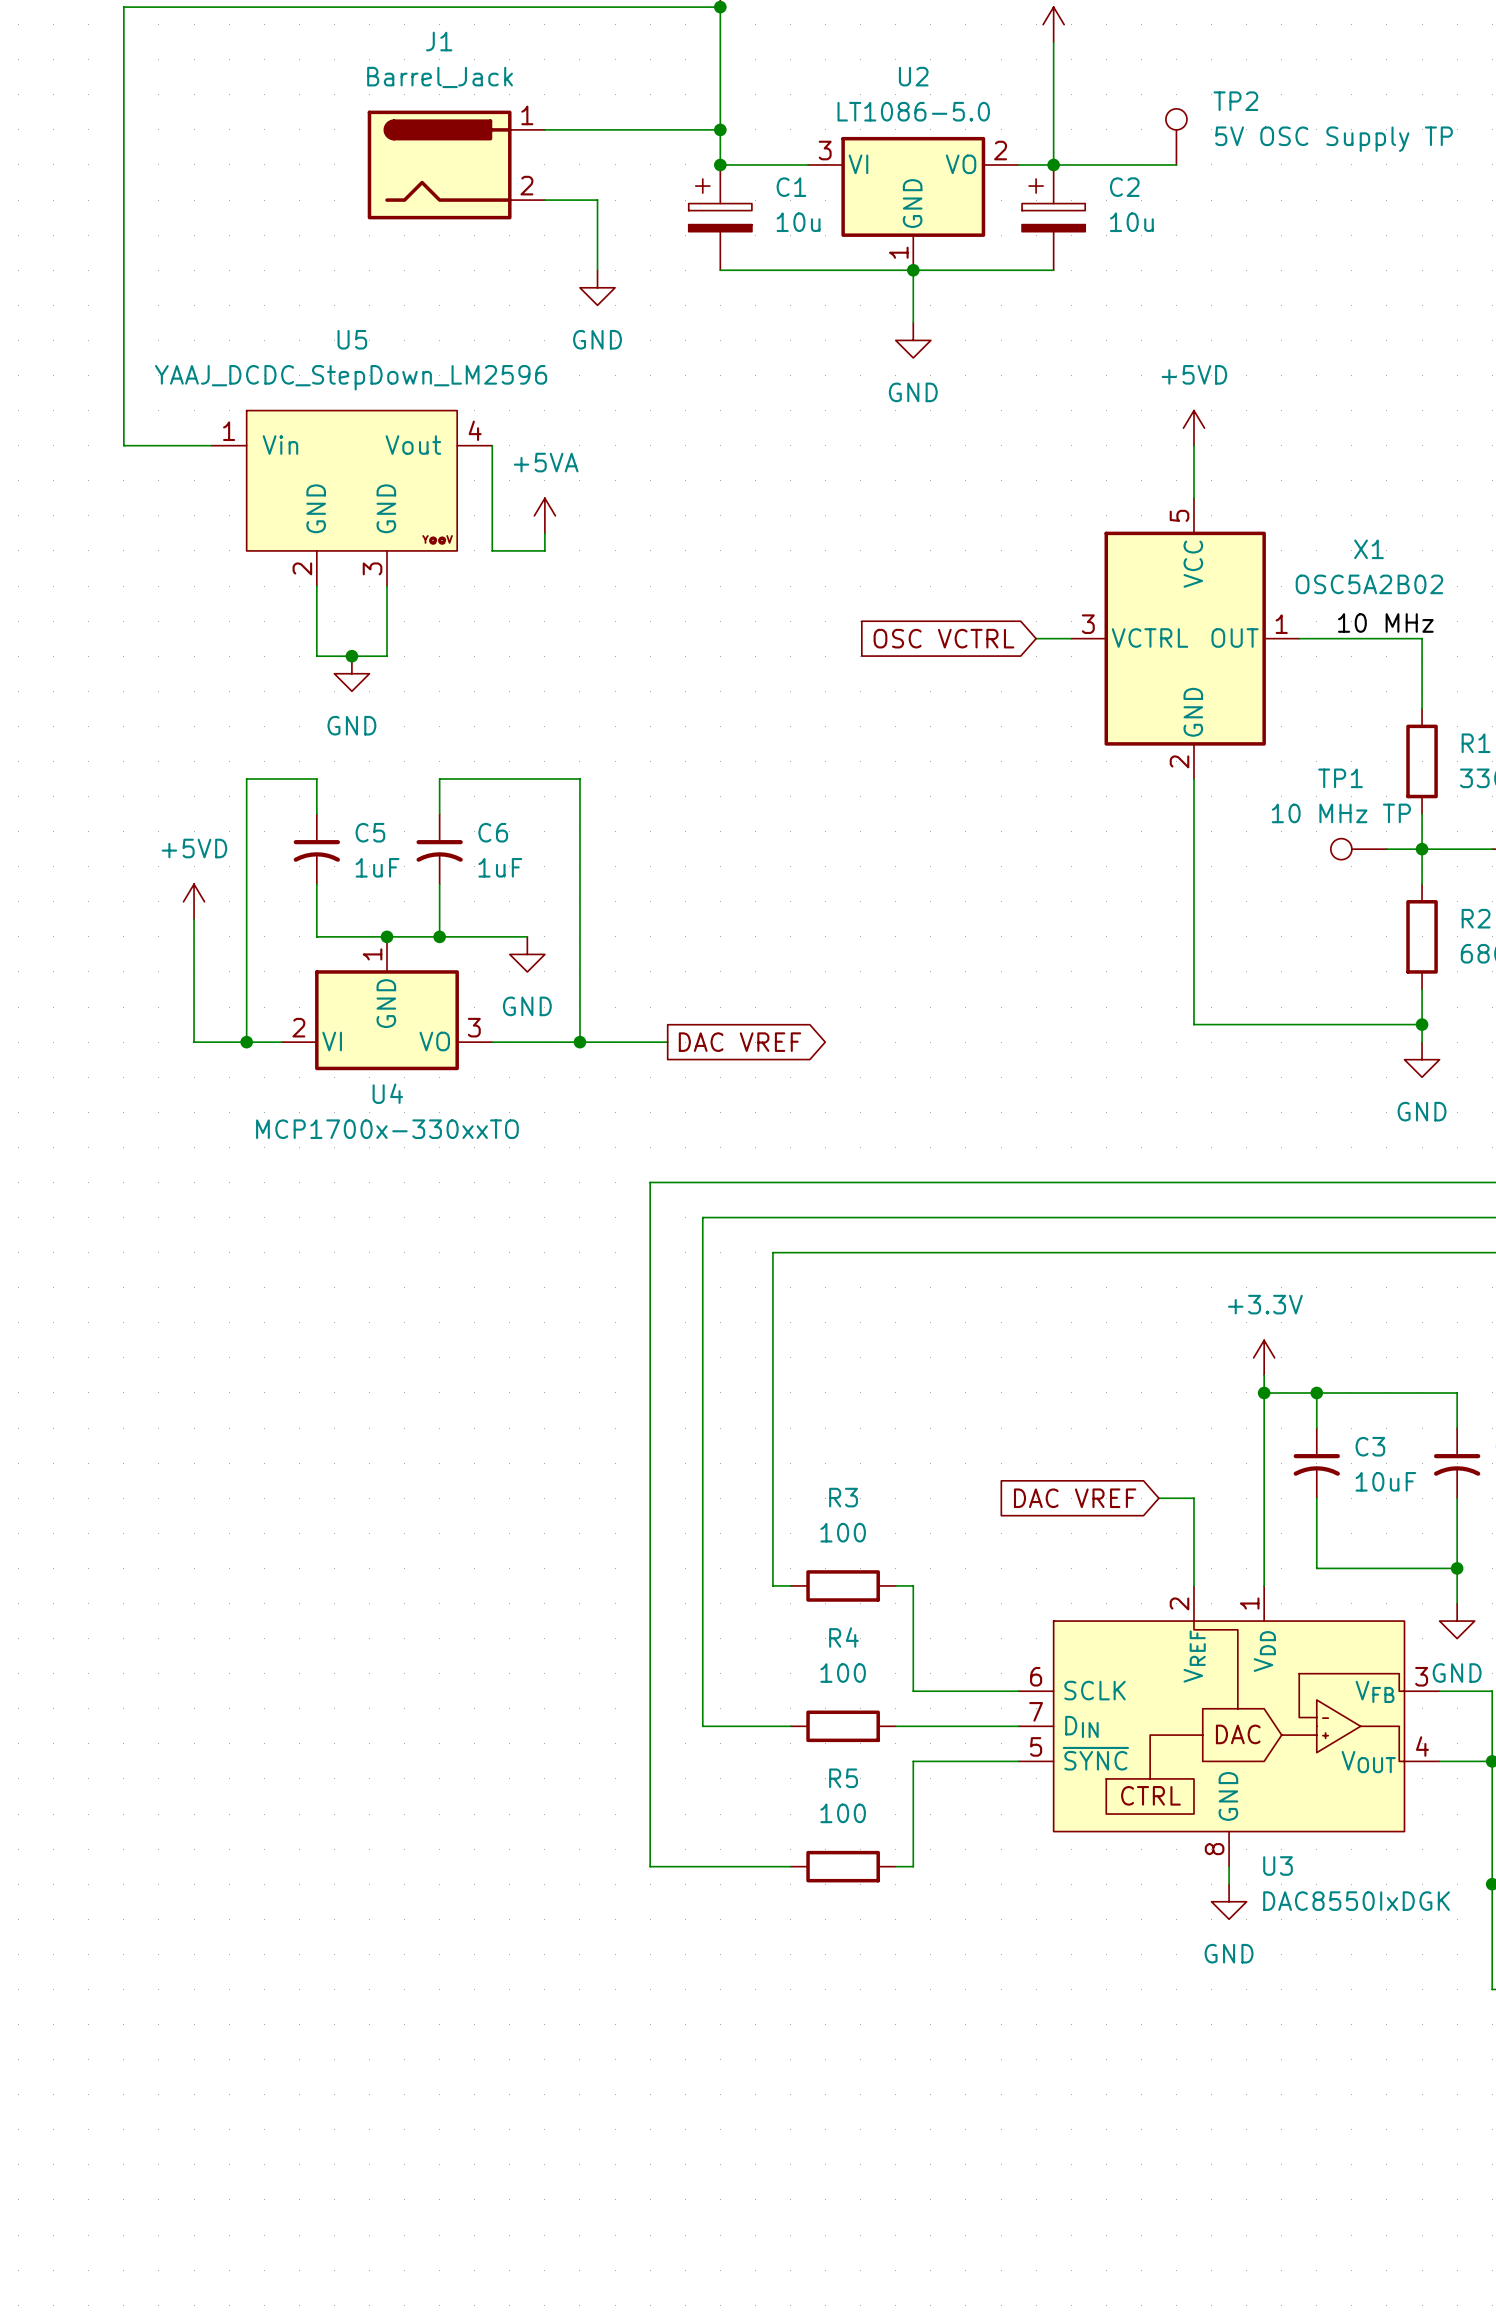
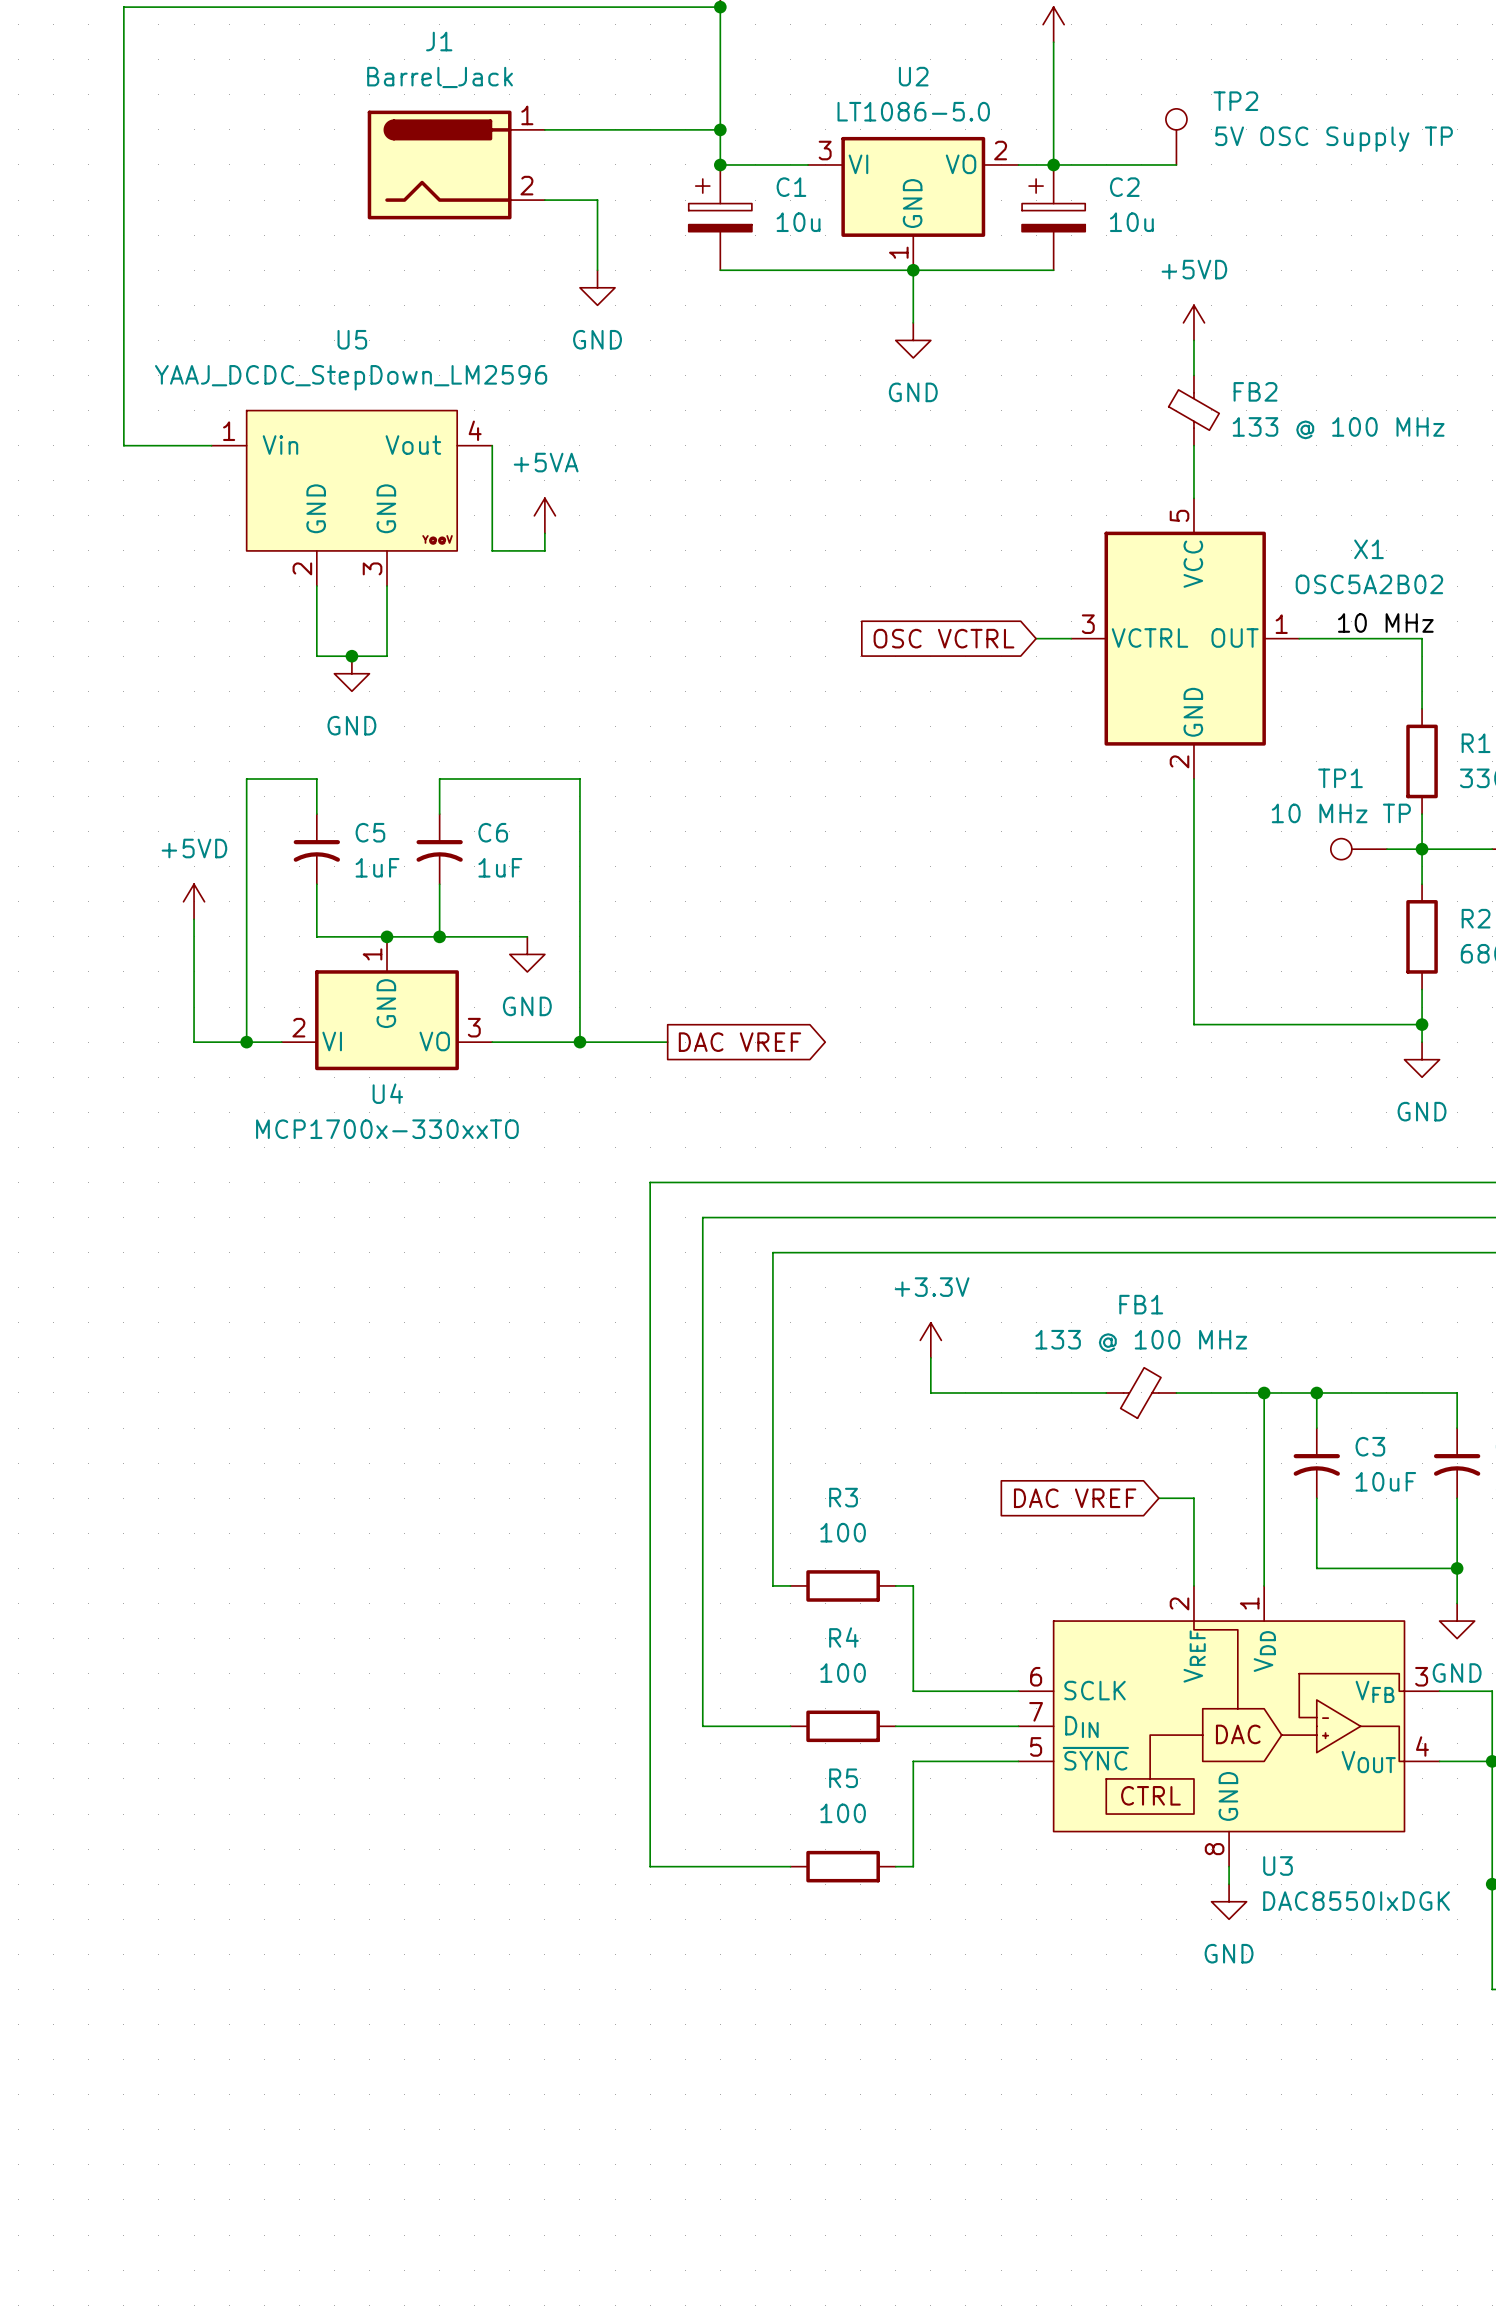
wire: none -> (1193, 340) (1193, 375)
FB2: none -> 133 @ 100 MHz (1193, 410)
power symbol position: +5VD (1193, 428) -> +5VD (1193, 322)
wire: none -> (930, 1357) (930, 1392) (1106, 1392)
power symbol position: +3.3V (1264, 1357) -> +3.3V (930, 1340)
wire: (1264, 1375) (1264, 1392) -> (1176, 1392) (1264, 1392)
FB1: none -> 133 @ 100 MHz (1141, 1392)

